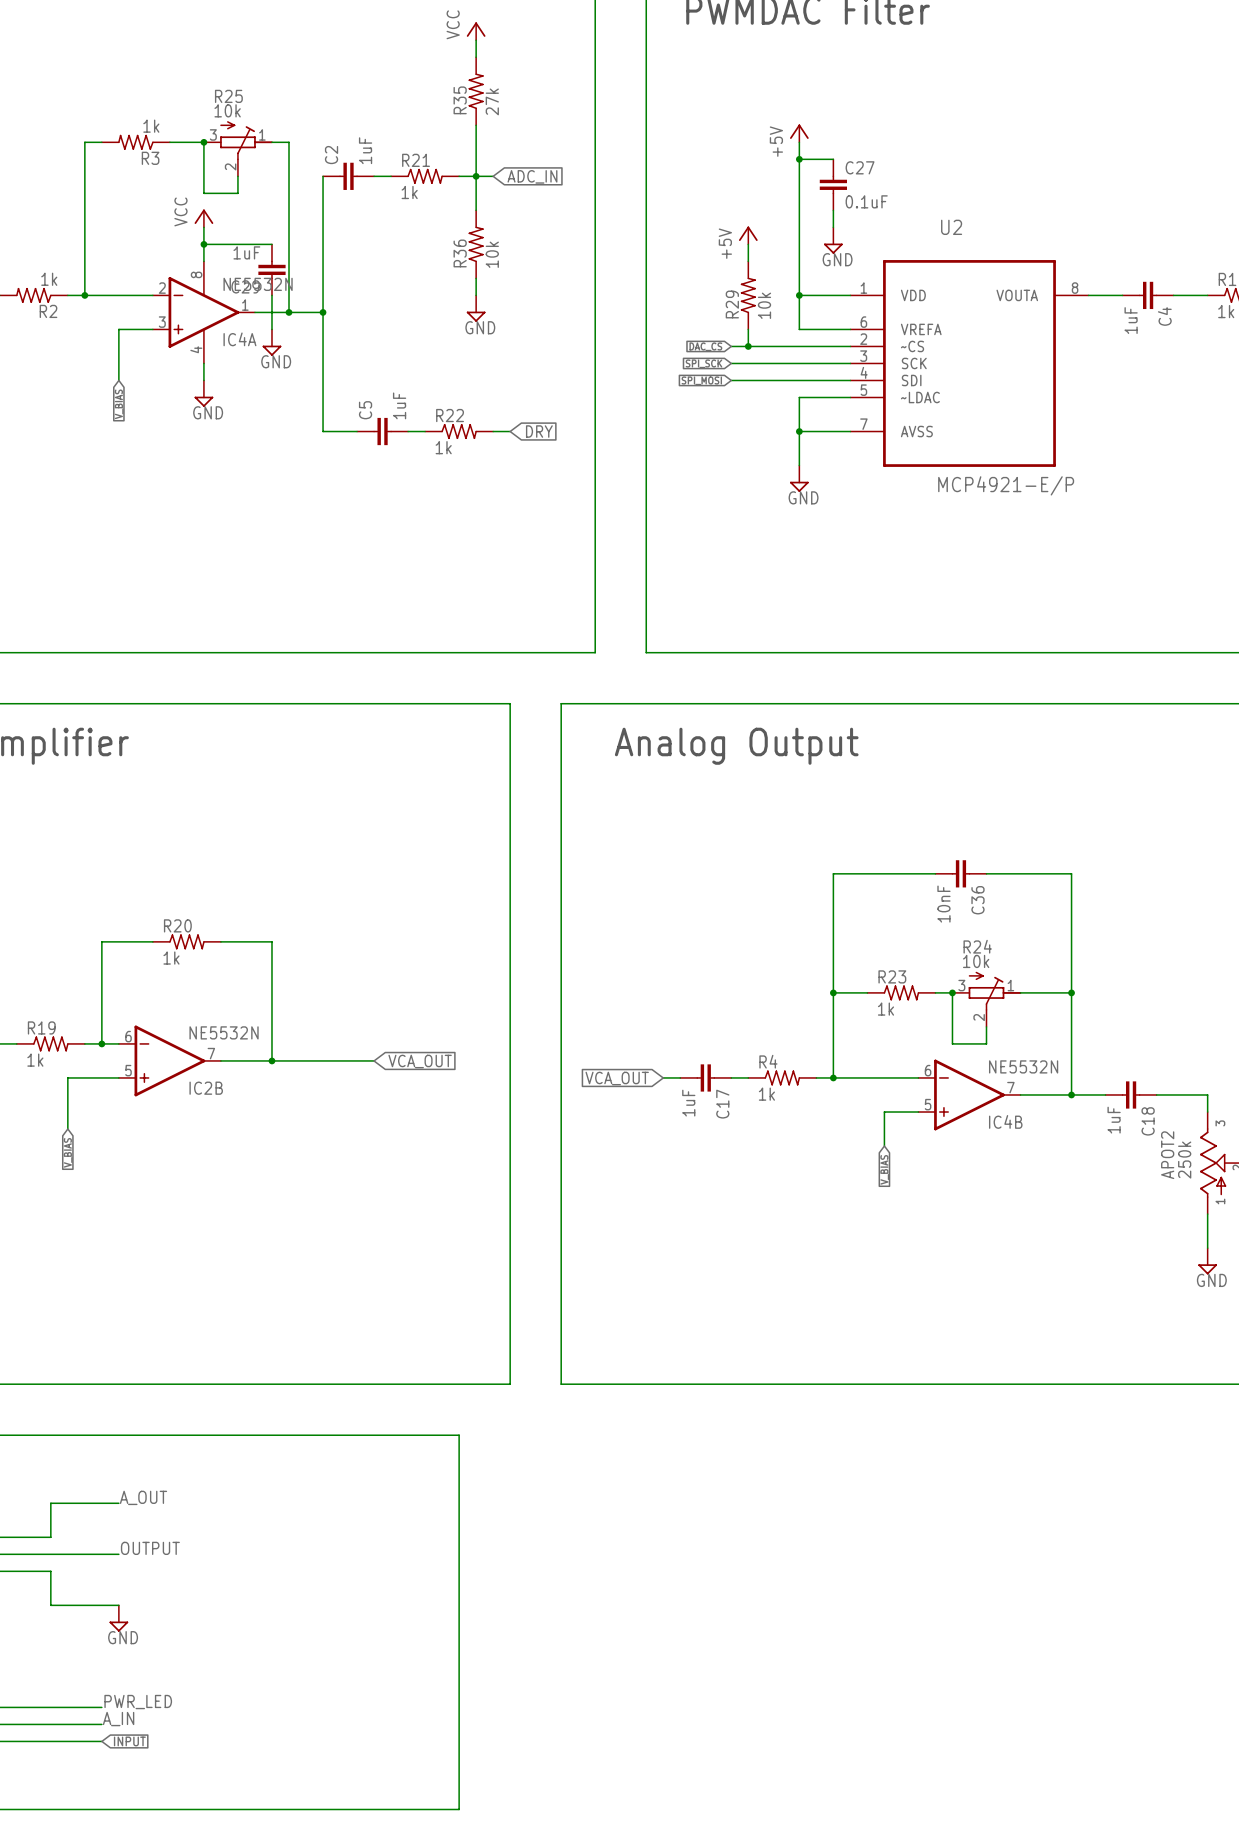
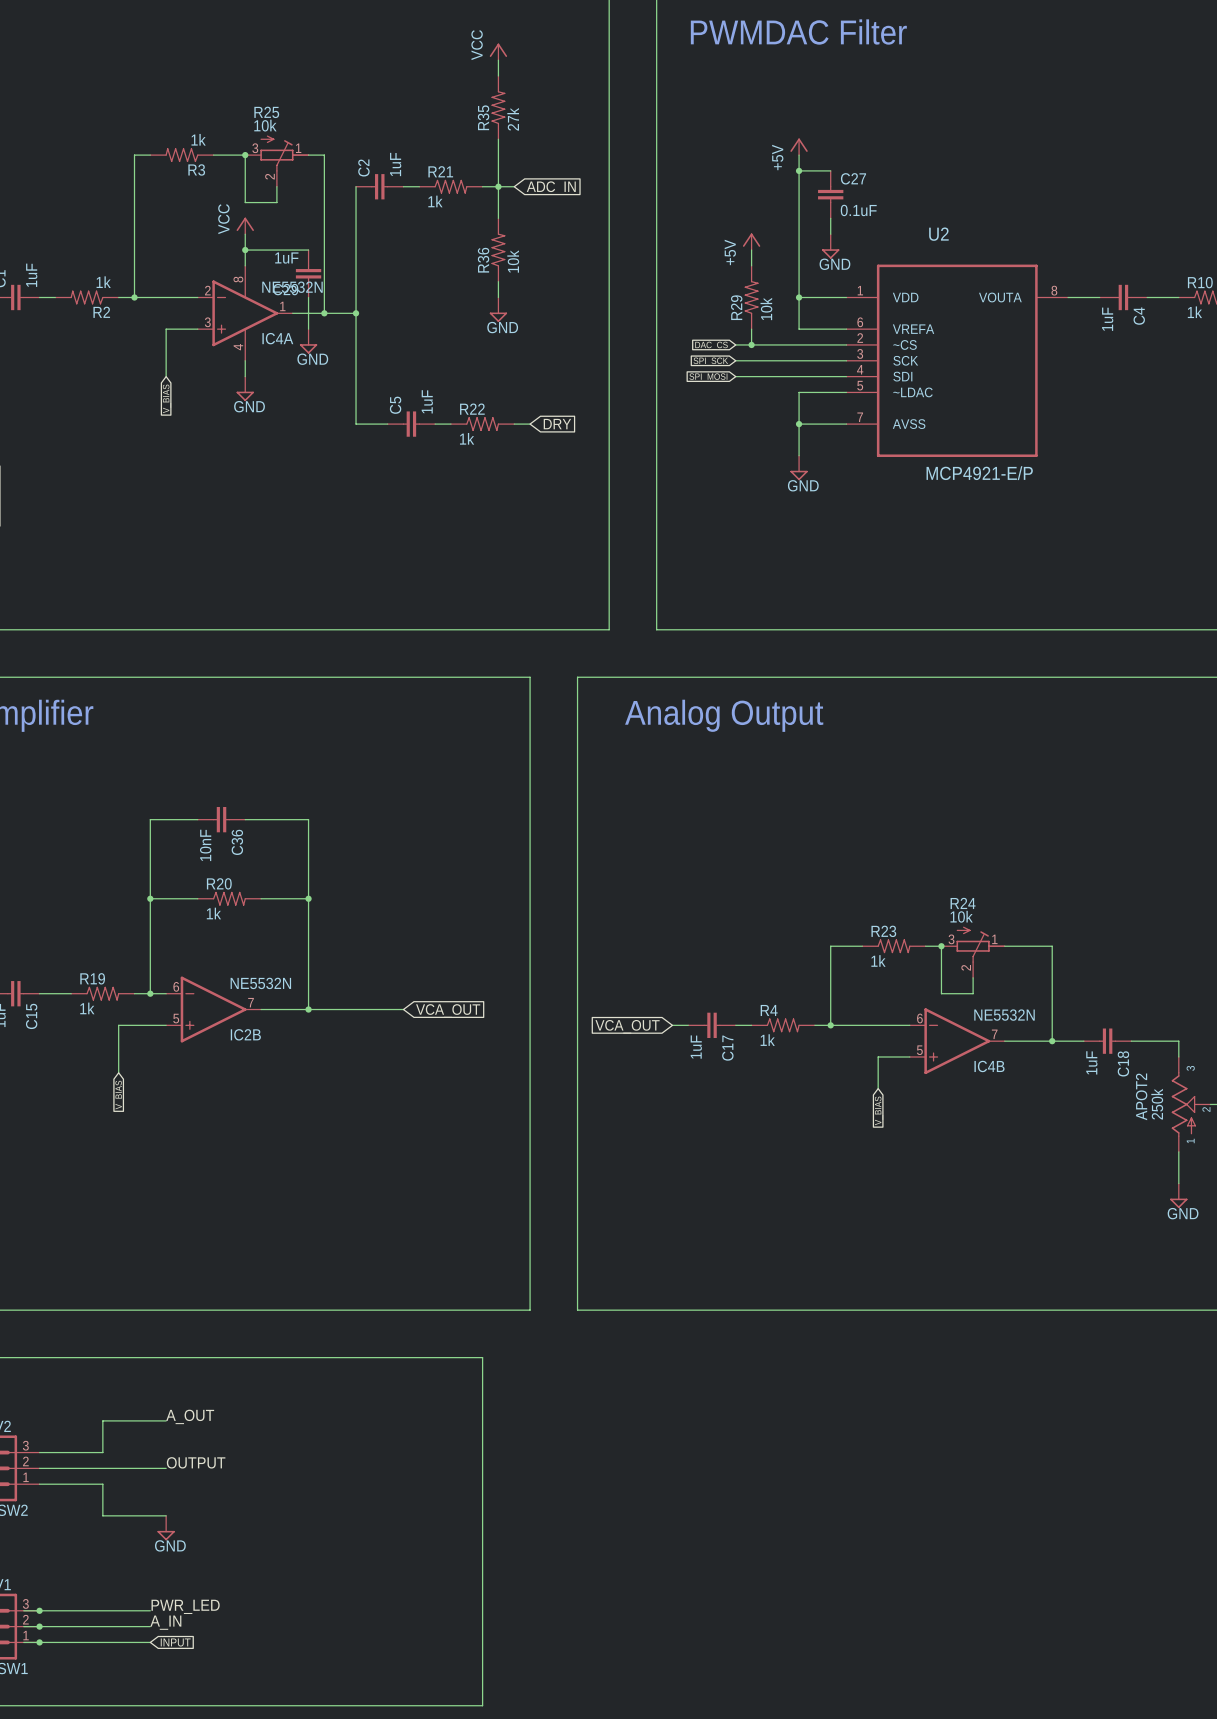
wire: none -> (197, 819) (150, 819) (150, 898)
wire: none -> (245, 819) (308, 819) (308, 898)
wire: (935, 873) (833, 873) (833, 992) -> none
C36 position: (960, 873) -> (221, 819)
wire: (986, 873) (1071, 873) (1071, 992) -> none
junction: none -> (150, 898)
junction: none -> (308, 898)
junction: (833, 992) -> none
junction: (1071, 992) -> none

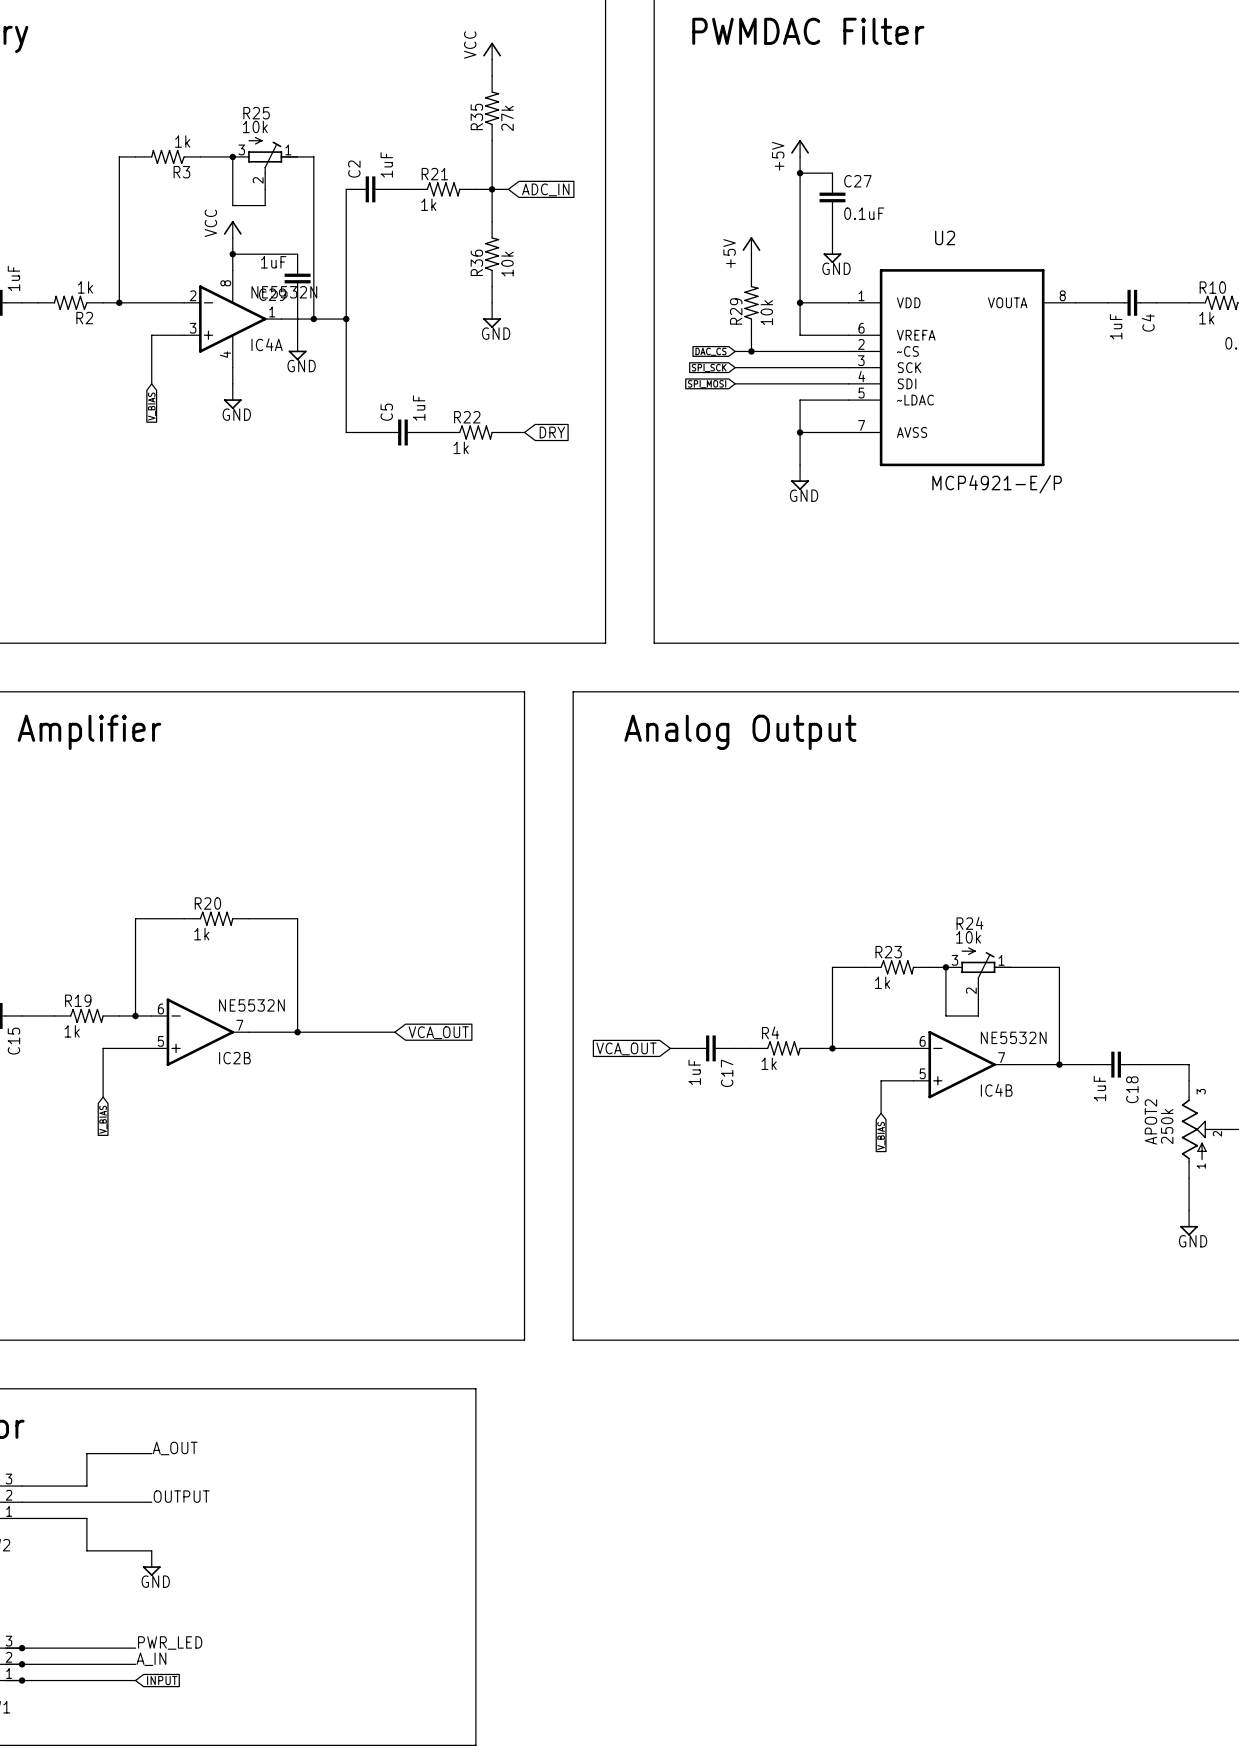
wire: (197, 819) (150, 819) (150, 898) -> none
C36: 10nF (221, 819) -> none
wire: (245, 819) (308, 819) (308, 898) -> none
junction: (150, 898) -> none
junction: (308, 898) -> none

